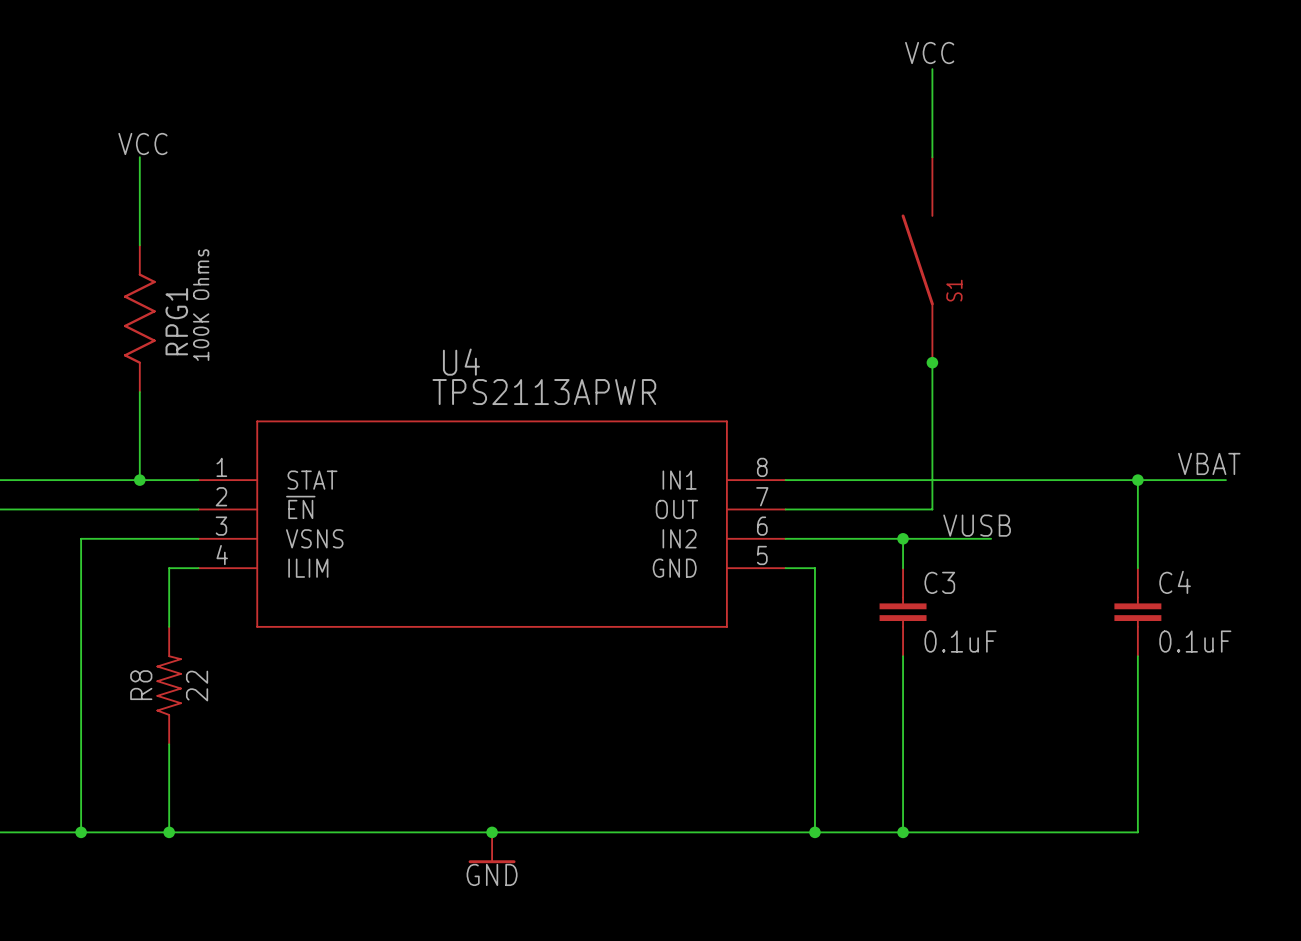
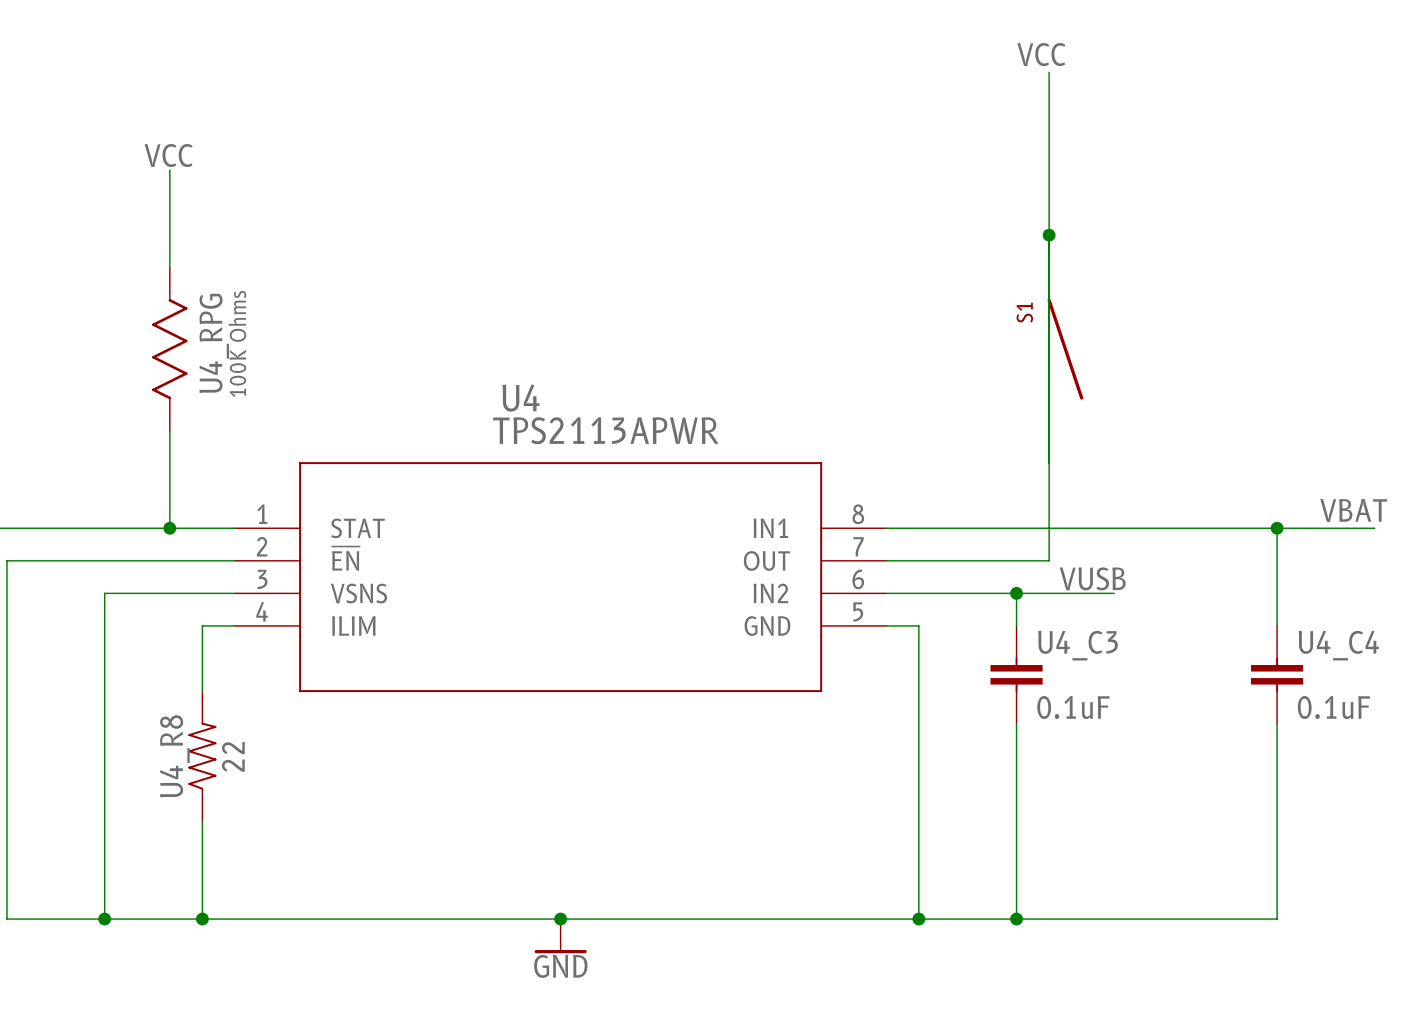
junction: none -> (1049, 235)
S1 rotation: 0° (917, 259) -> 180° (1065, 349)
RPG1 name: RPG1 (176, 321) -> U4_RPG (214, 343)
junction: (932, 362) -> none
C3 name: C3 (939, 582) -> U4_C3 (1077, 645)
C4 name: C4 (1175, 582) -> U4_C4 (1338, 645)
R8 name: R8 (141, 685) -> U4_R8 (174, 756)

